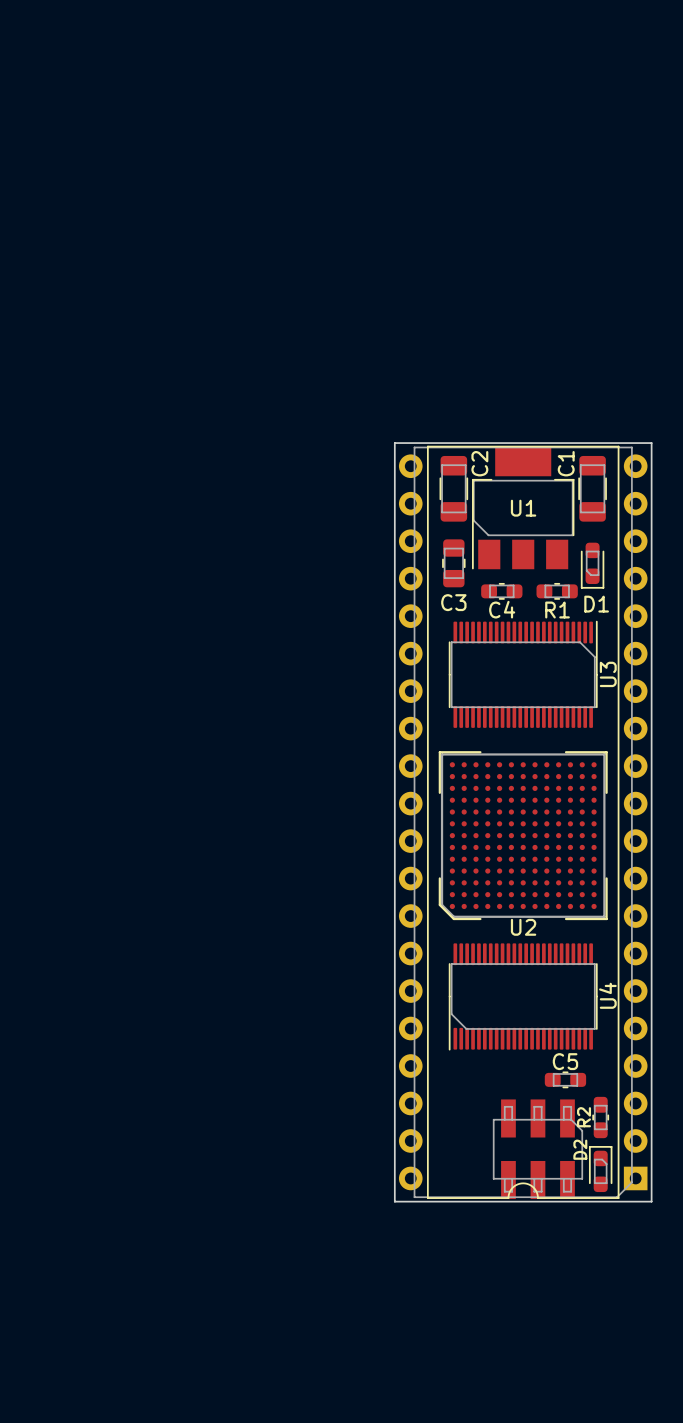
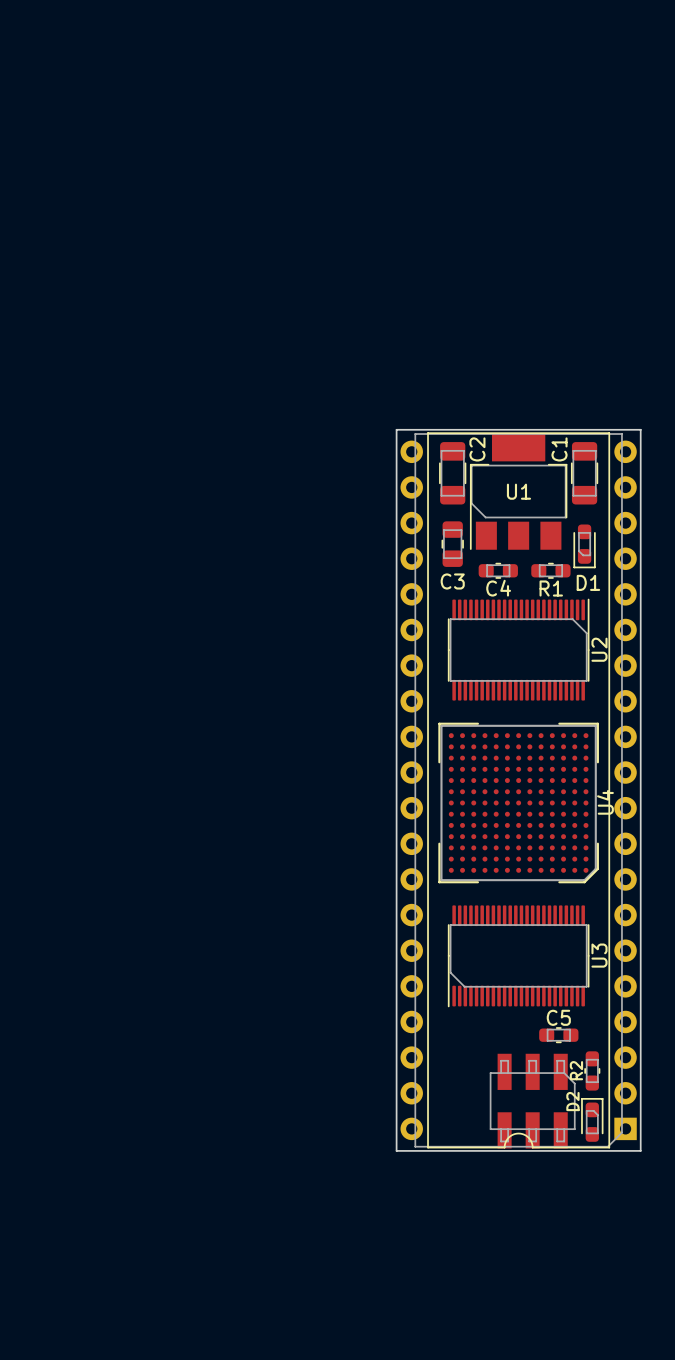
U3 name: U3 (608, 674) -> U2 (599, 649)
U2: (523, 835) -> none
U4: none -> (518, 802)
U4 name: U4 (607, 995) -> U3 (599, 955)

